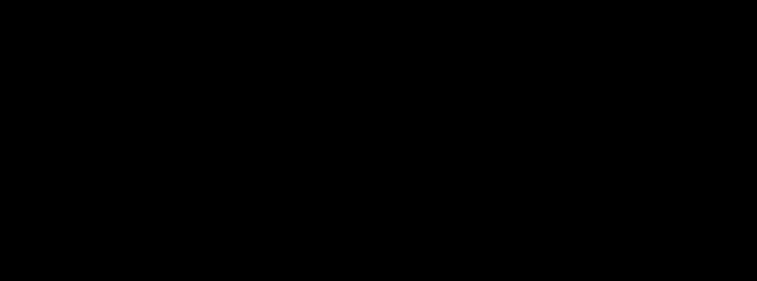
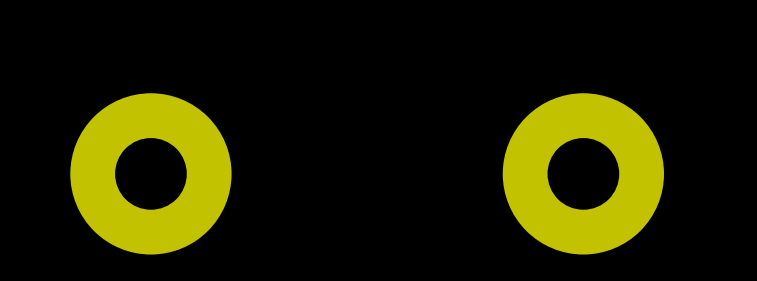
part: none -> (150, 173)
part: none -> (583, 173)

